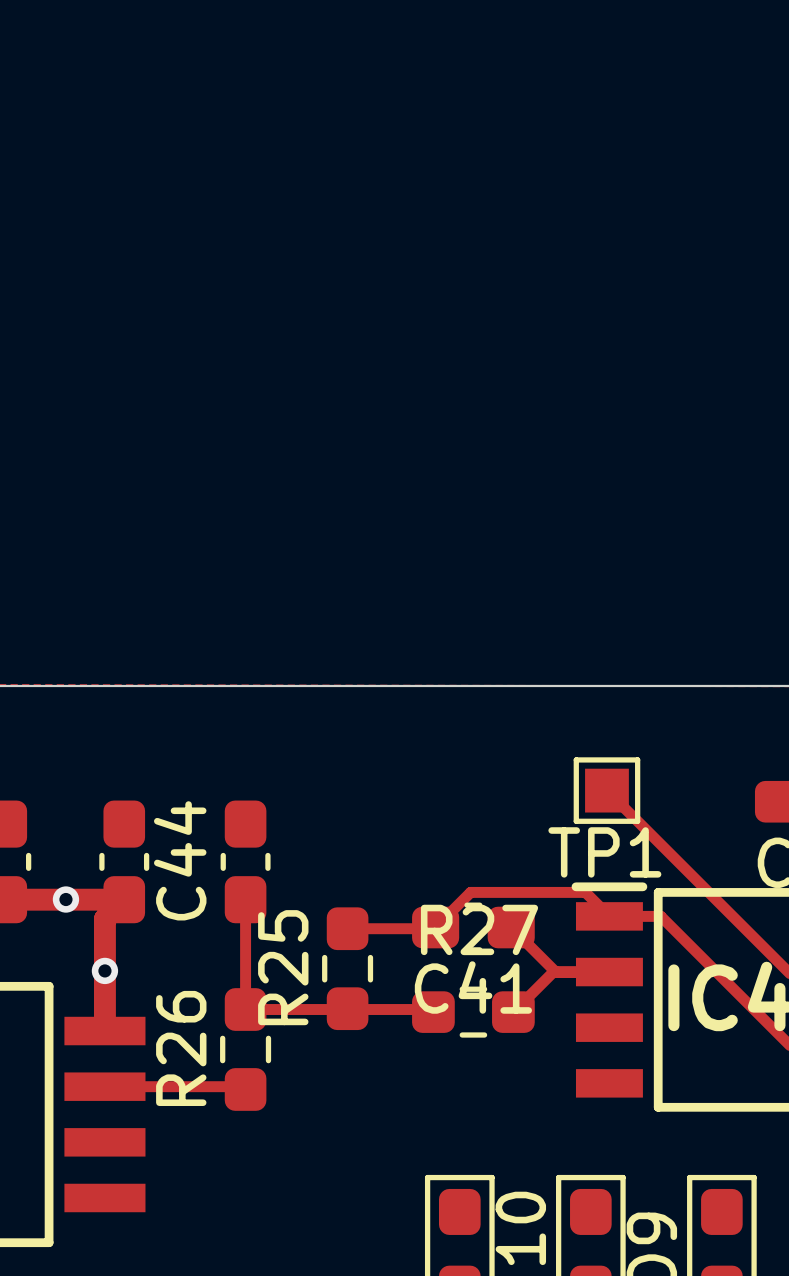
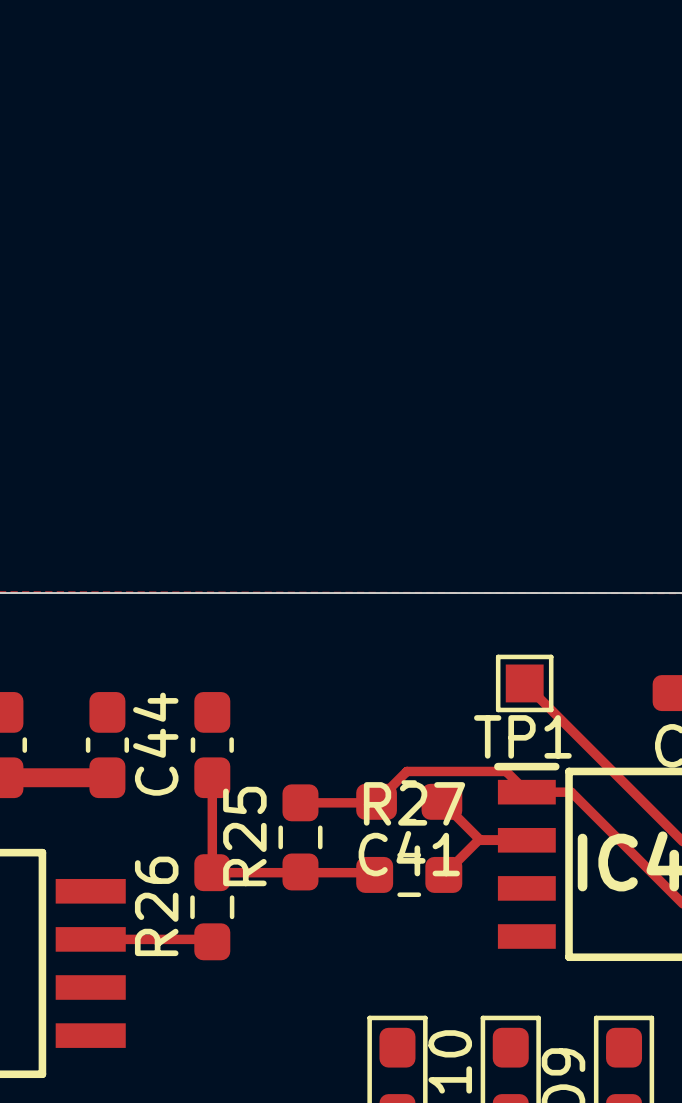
via: (65, 899) -> none
track: (124, 899) (104, 919) (104, 1031) -> none
via: (104, 970) -> none

